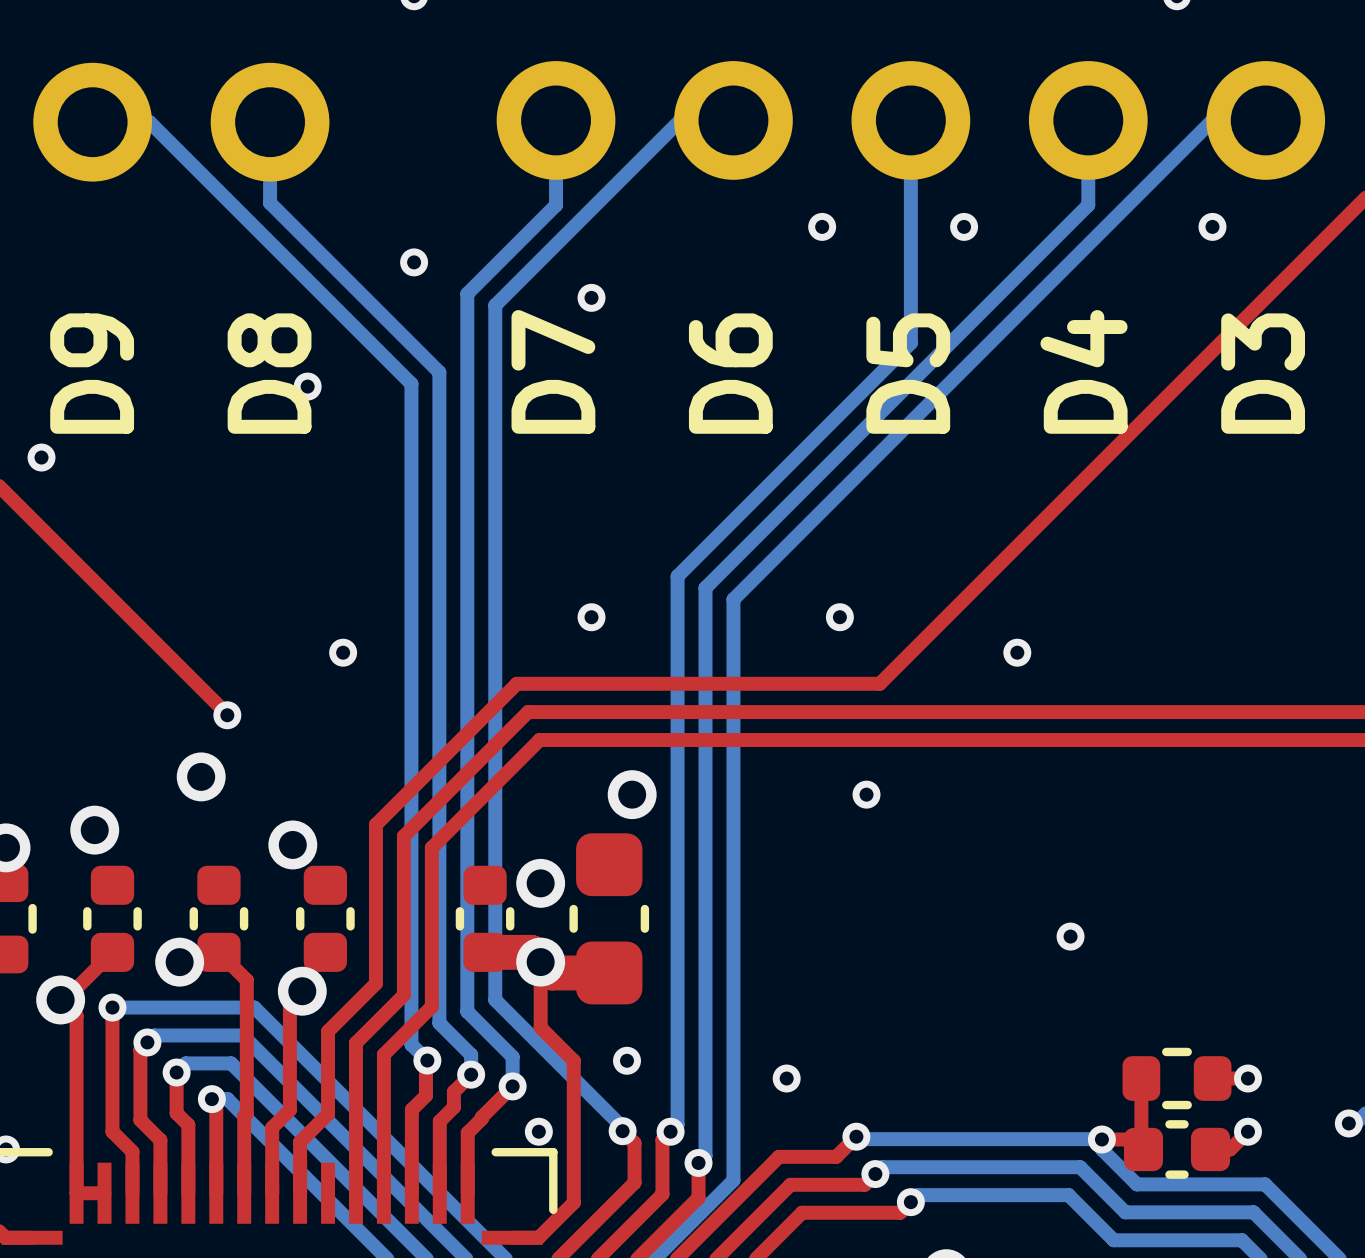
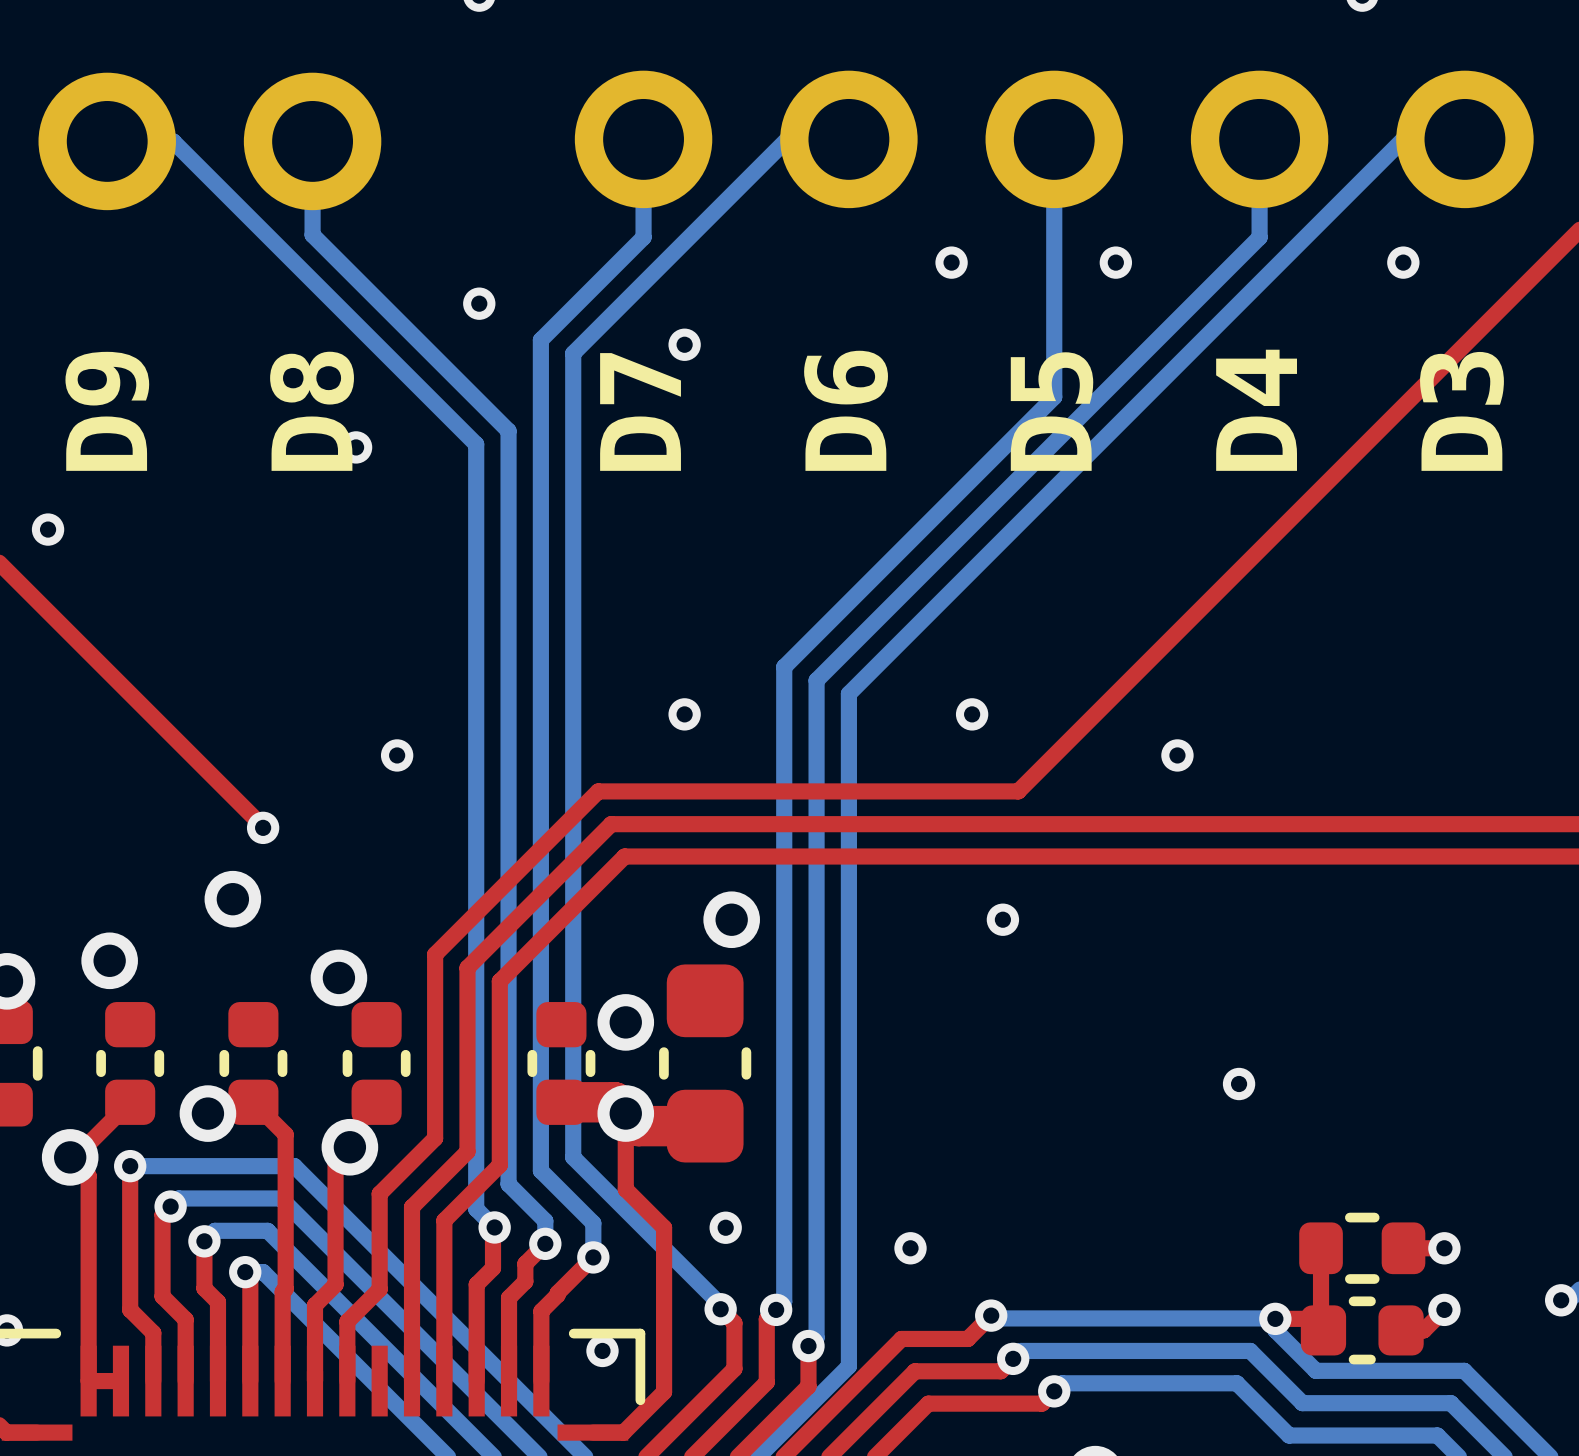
via position: (538, 1131) -> (602, 1350)

